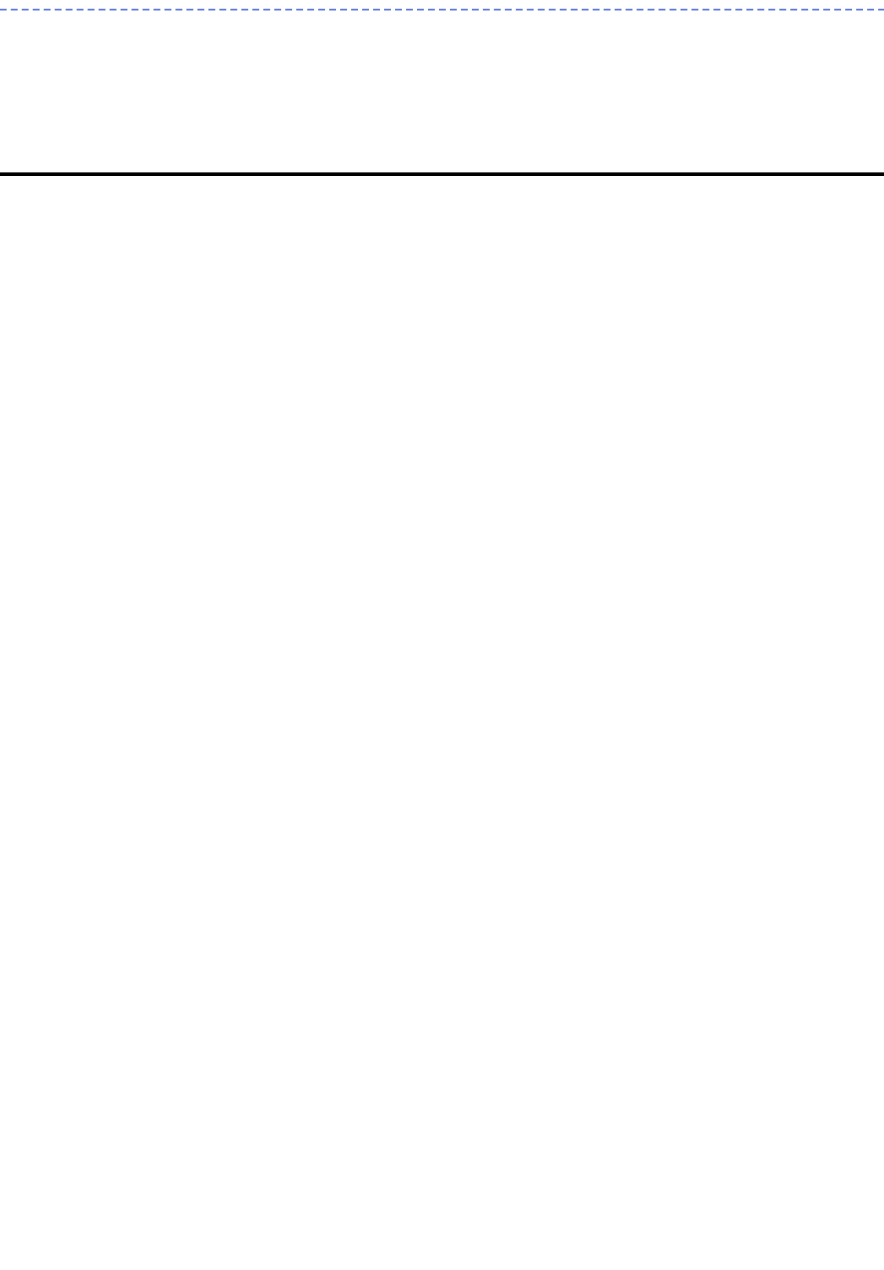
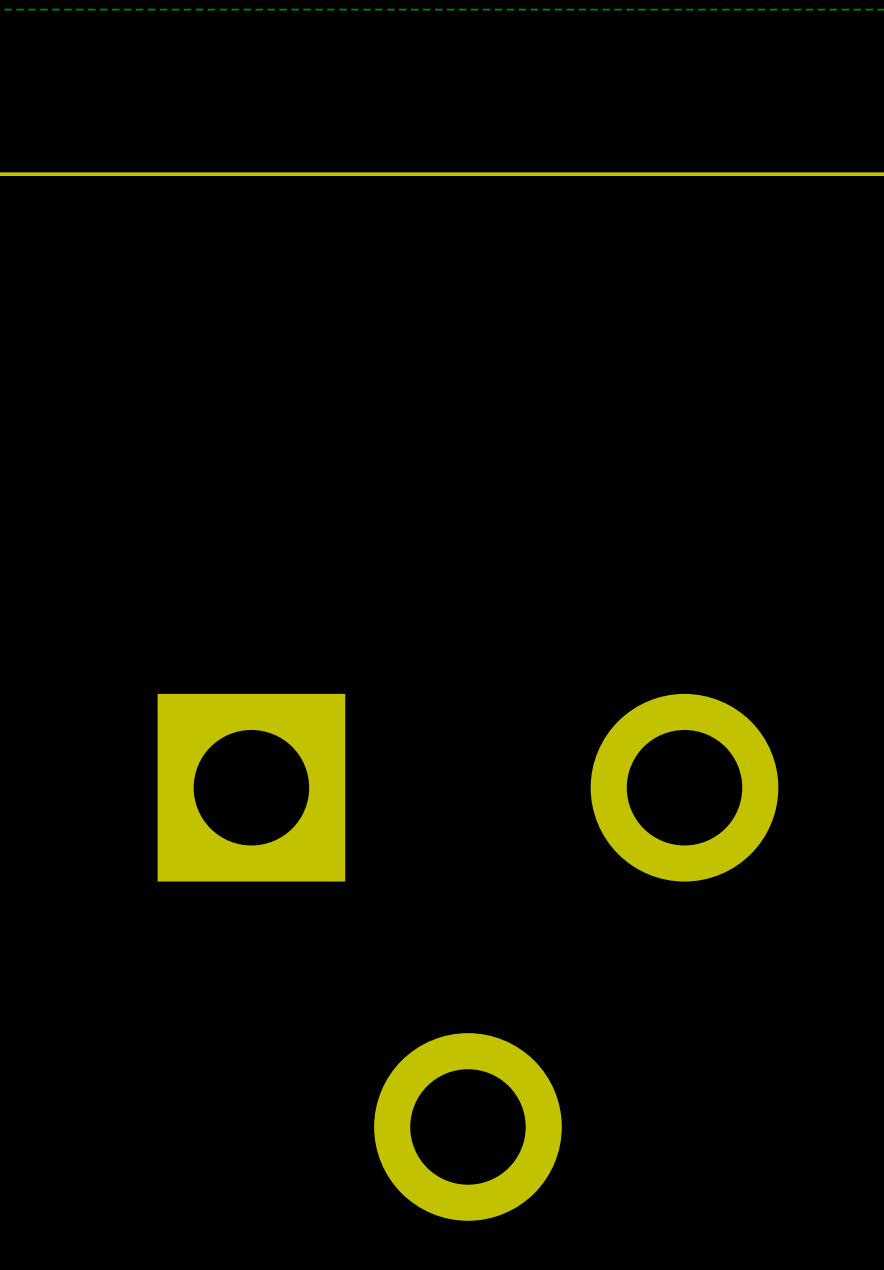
part: none -> (467, 957)

